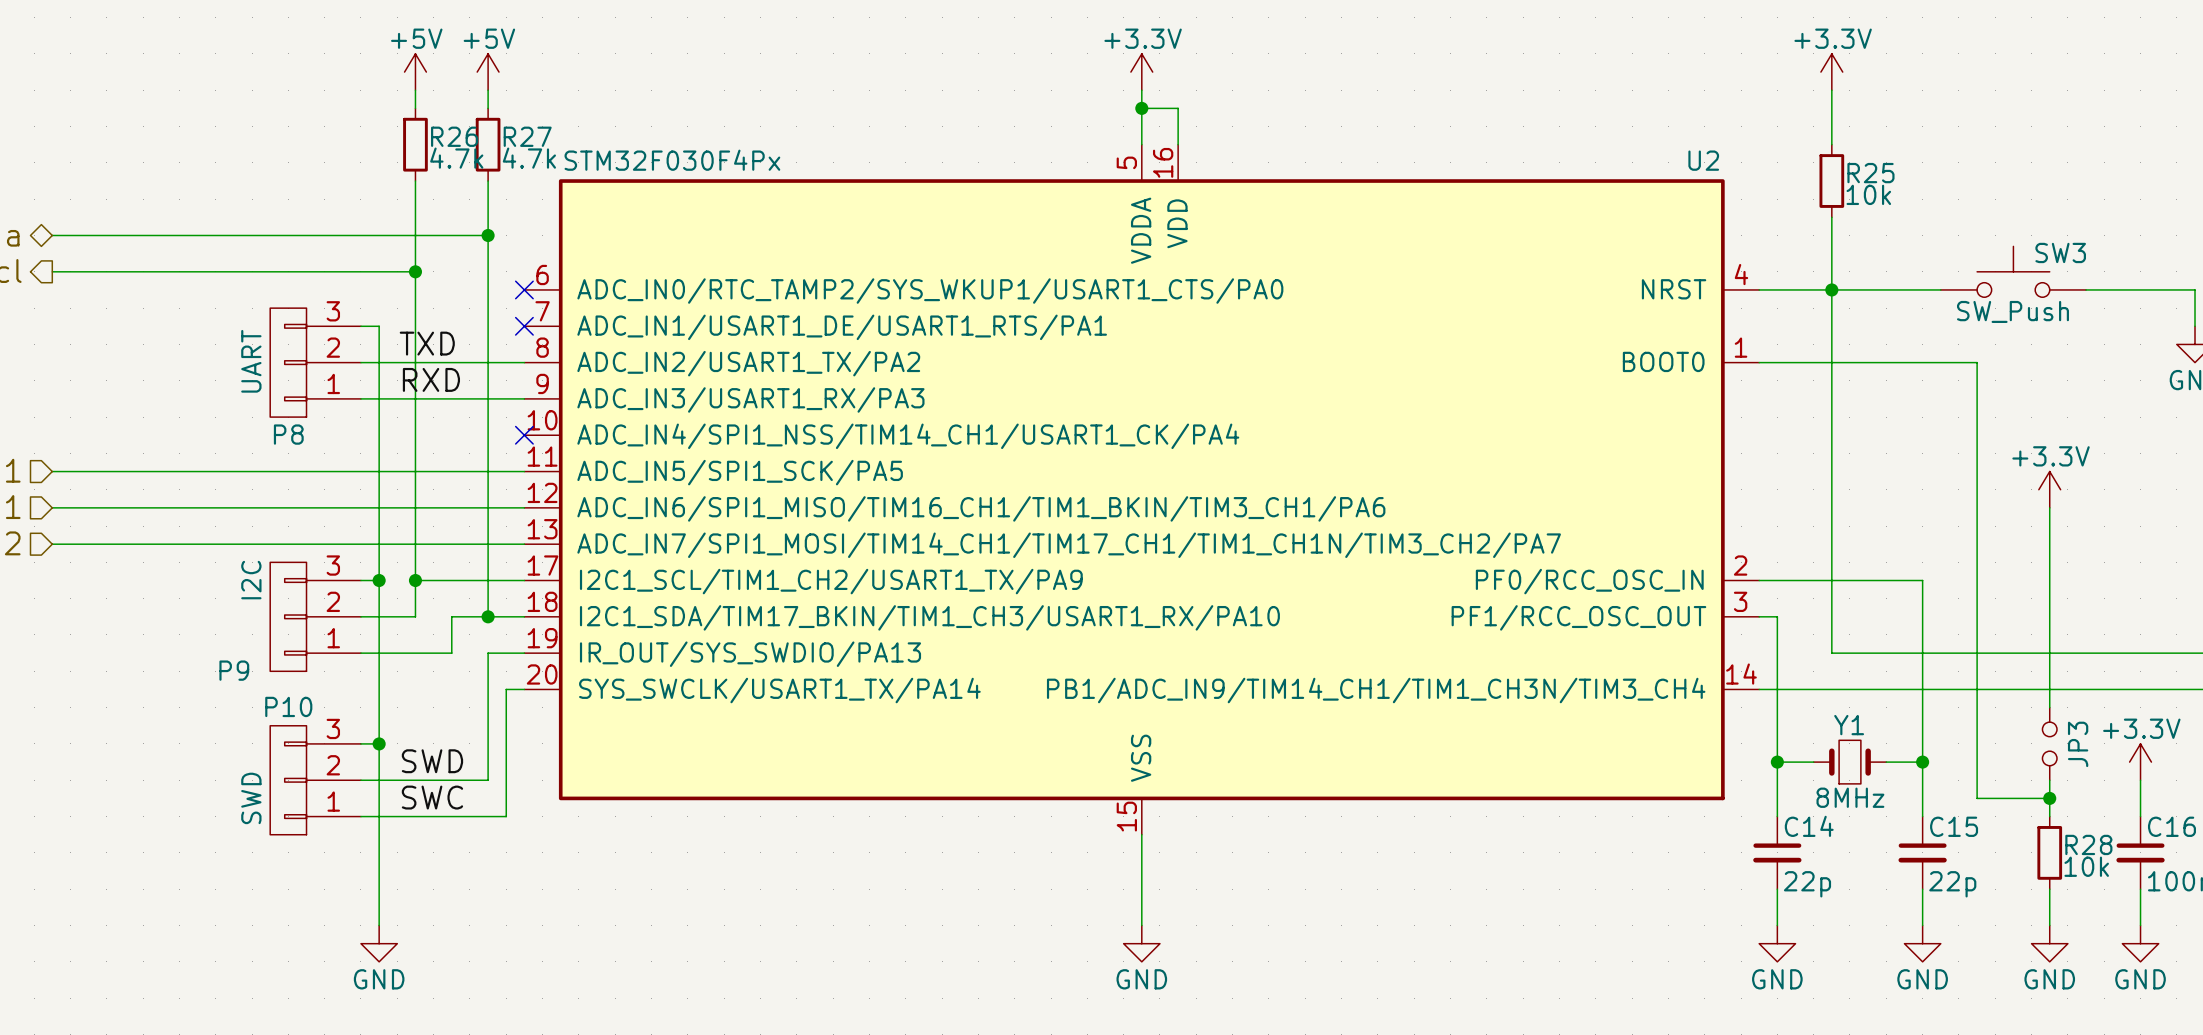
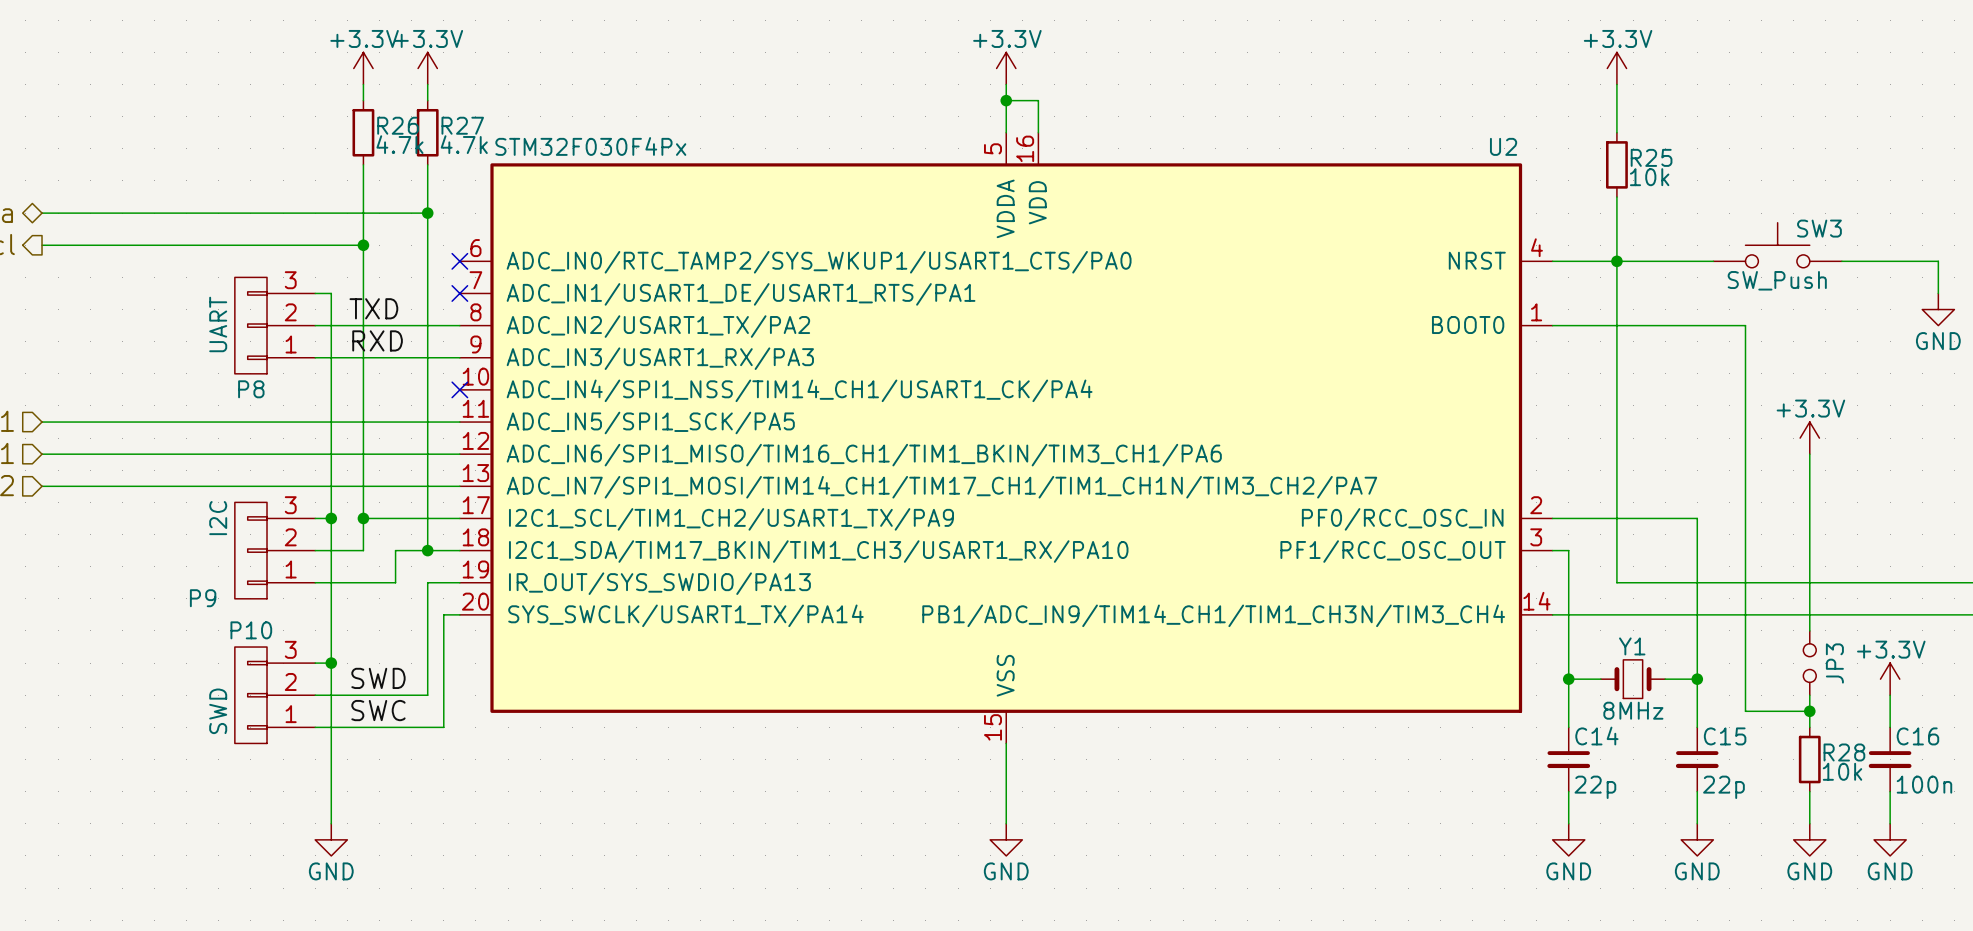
power symbol: +5V (415, 72) -> +3.3V (363, 68)
power symbol: +5V (488, 72) -> +3.3V (427, 68)

